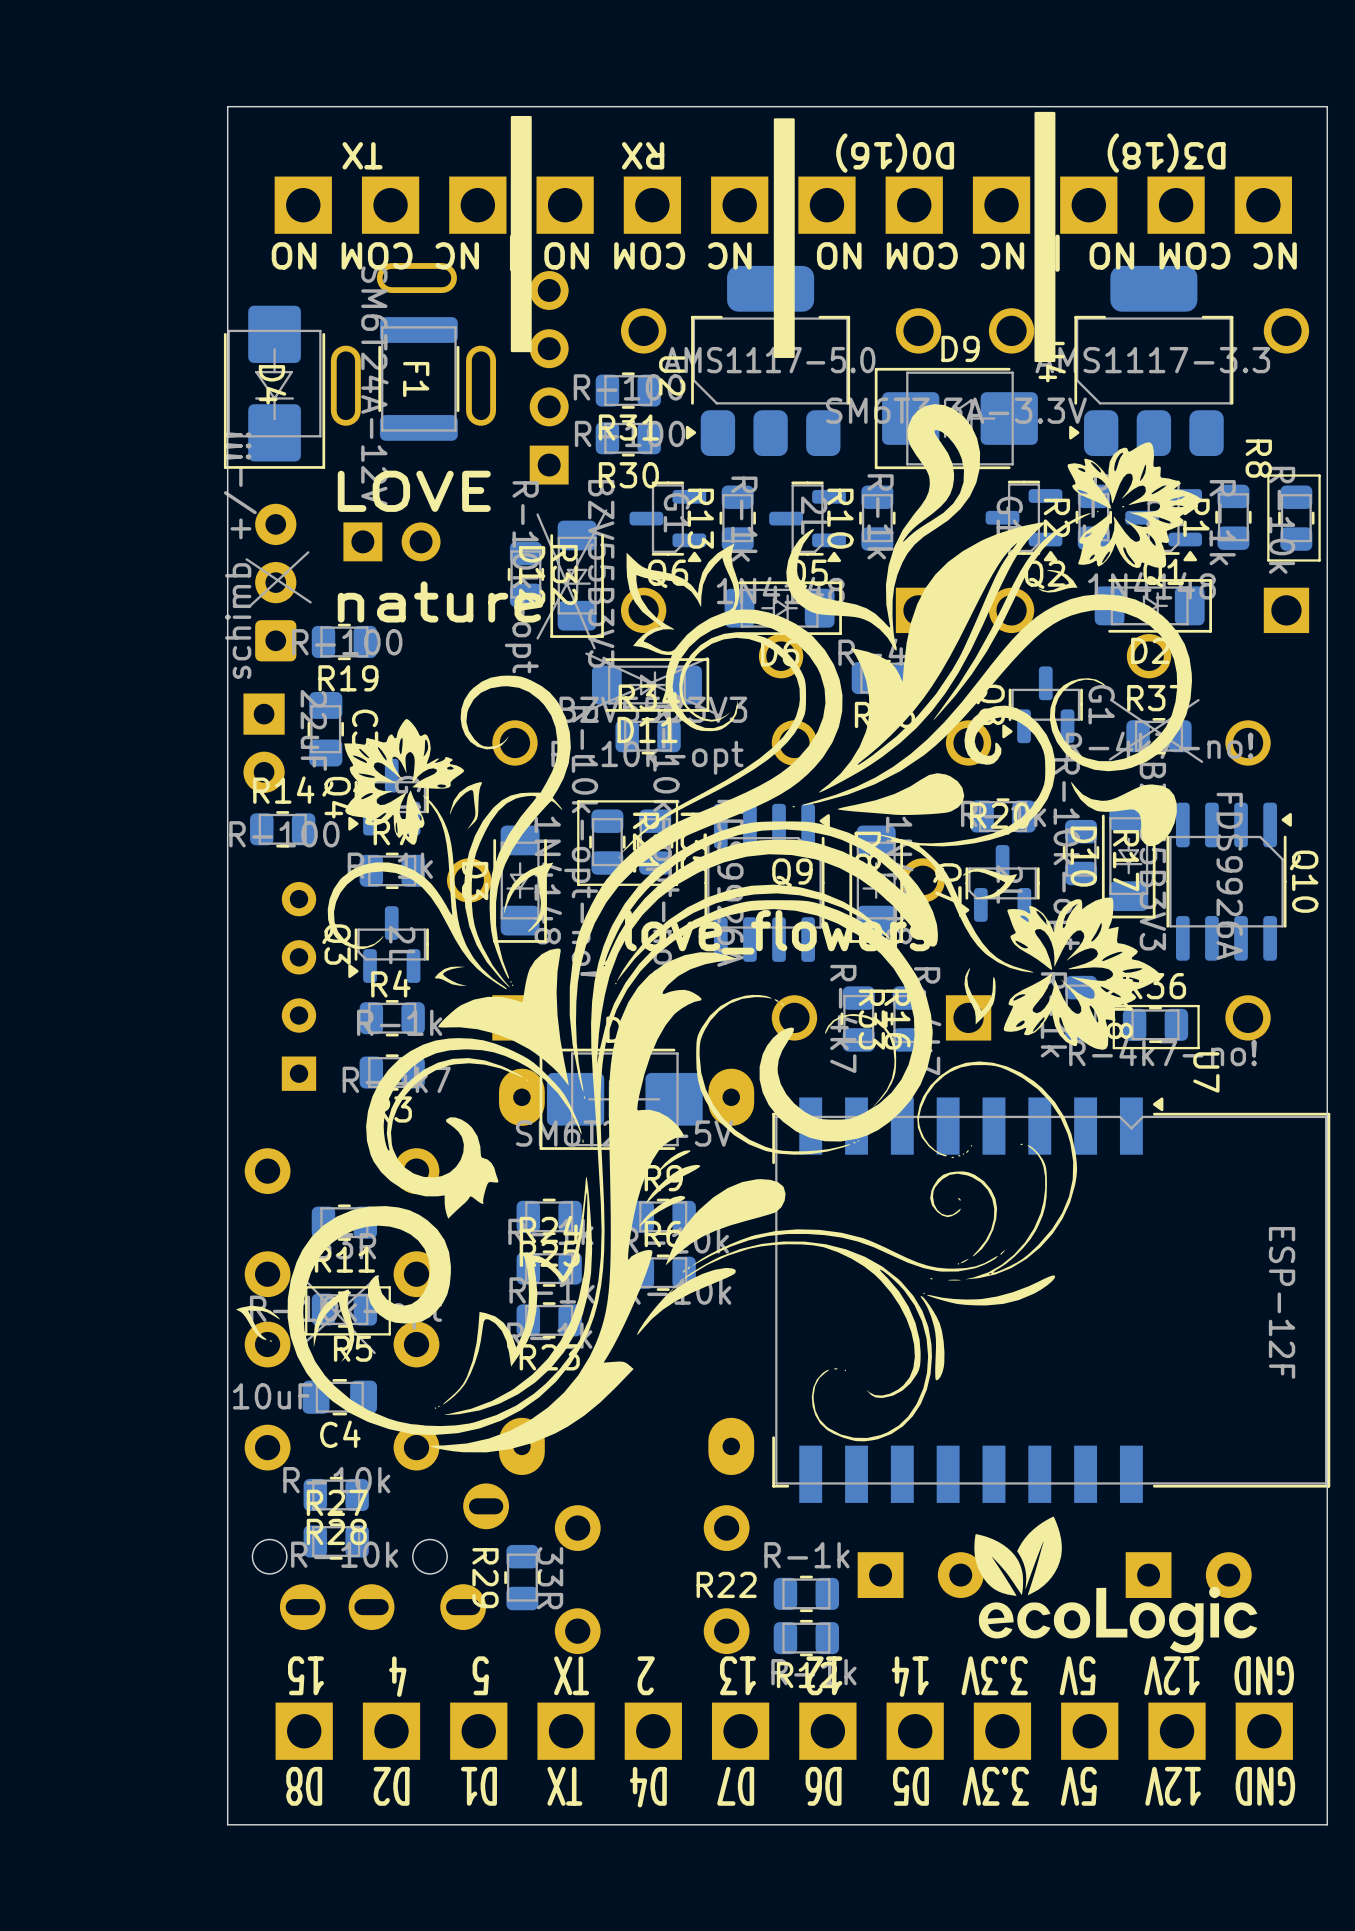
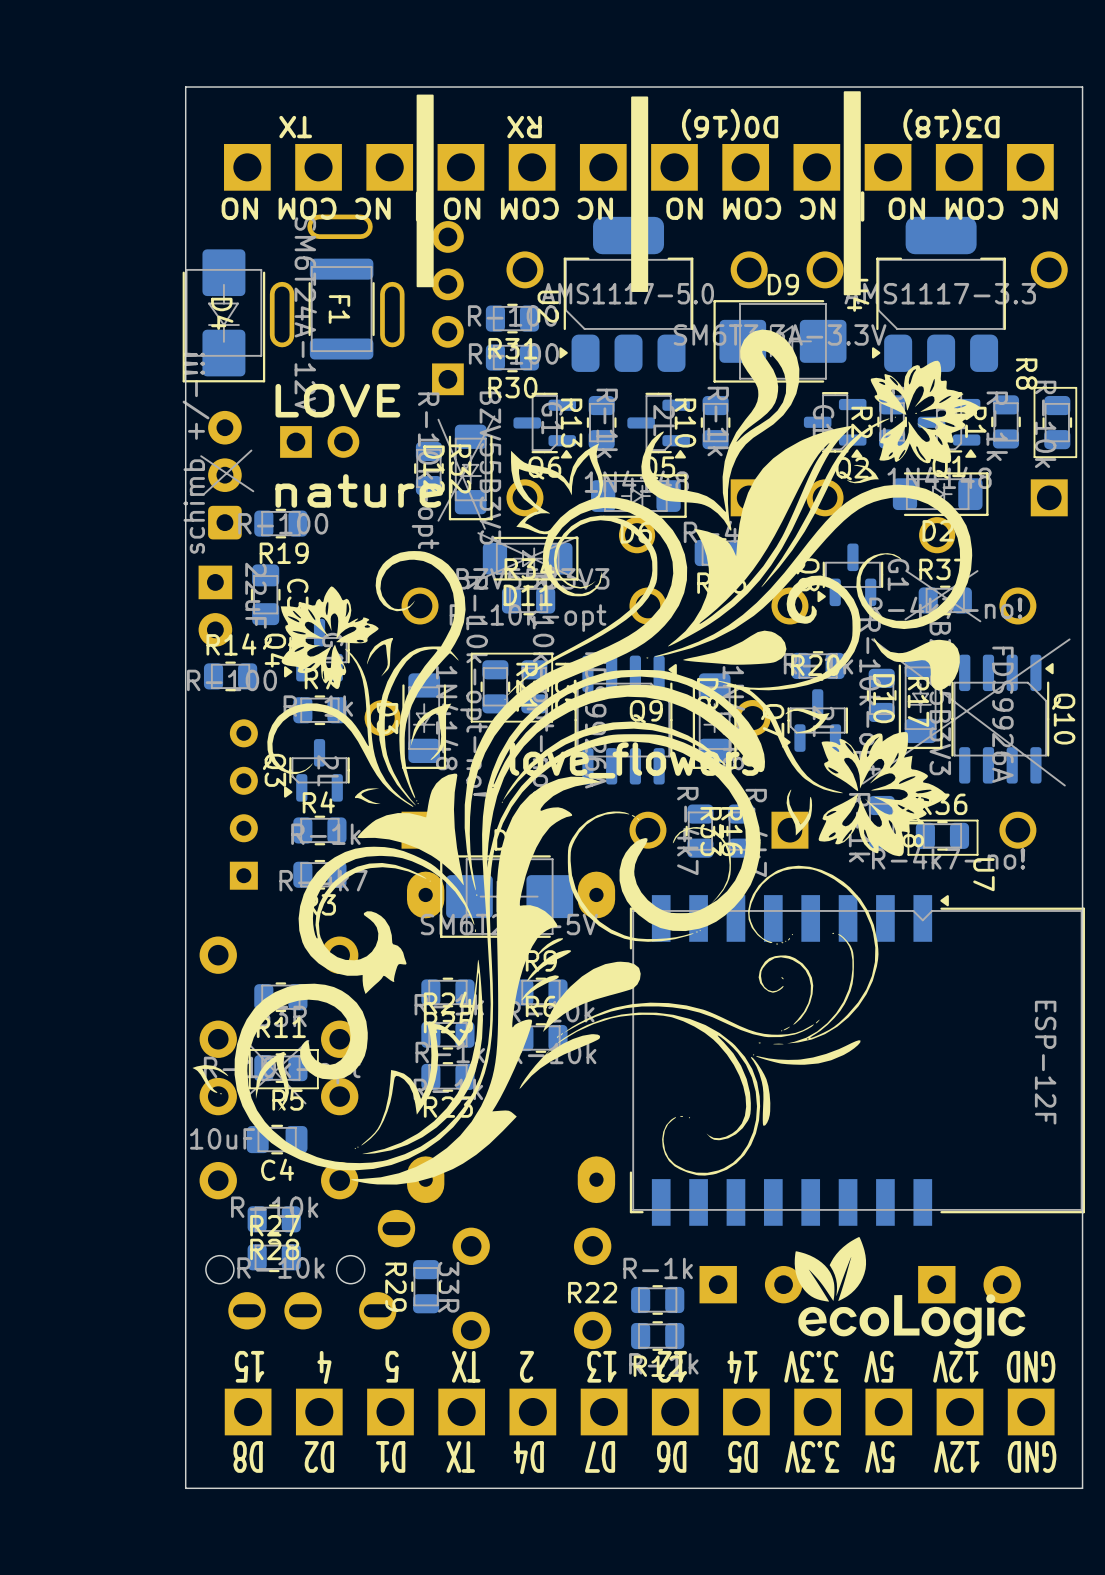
line: none -> (872, 639) (1064, 785)
line: none -> (1069, 639) (862, 783)

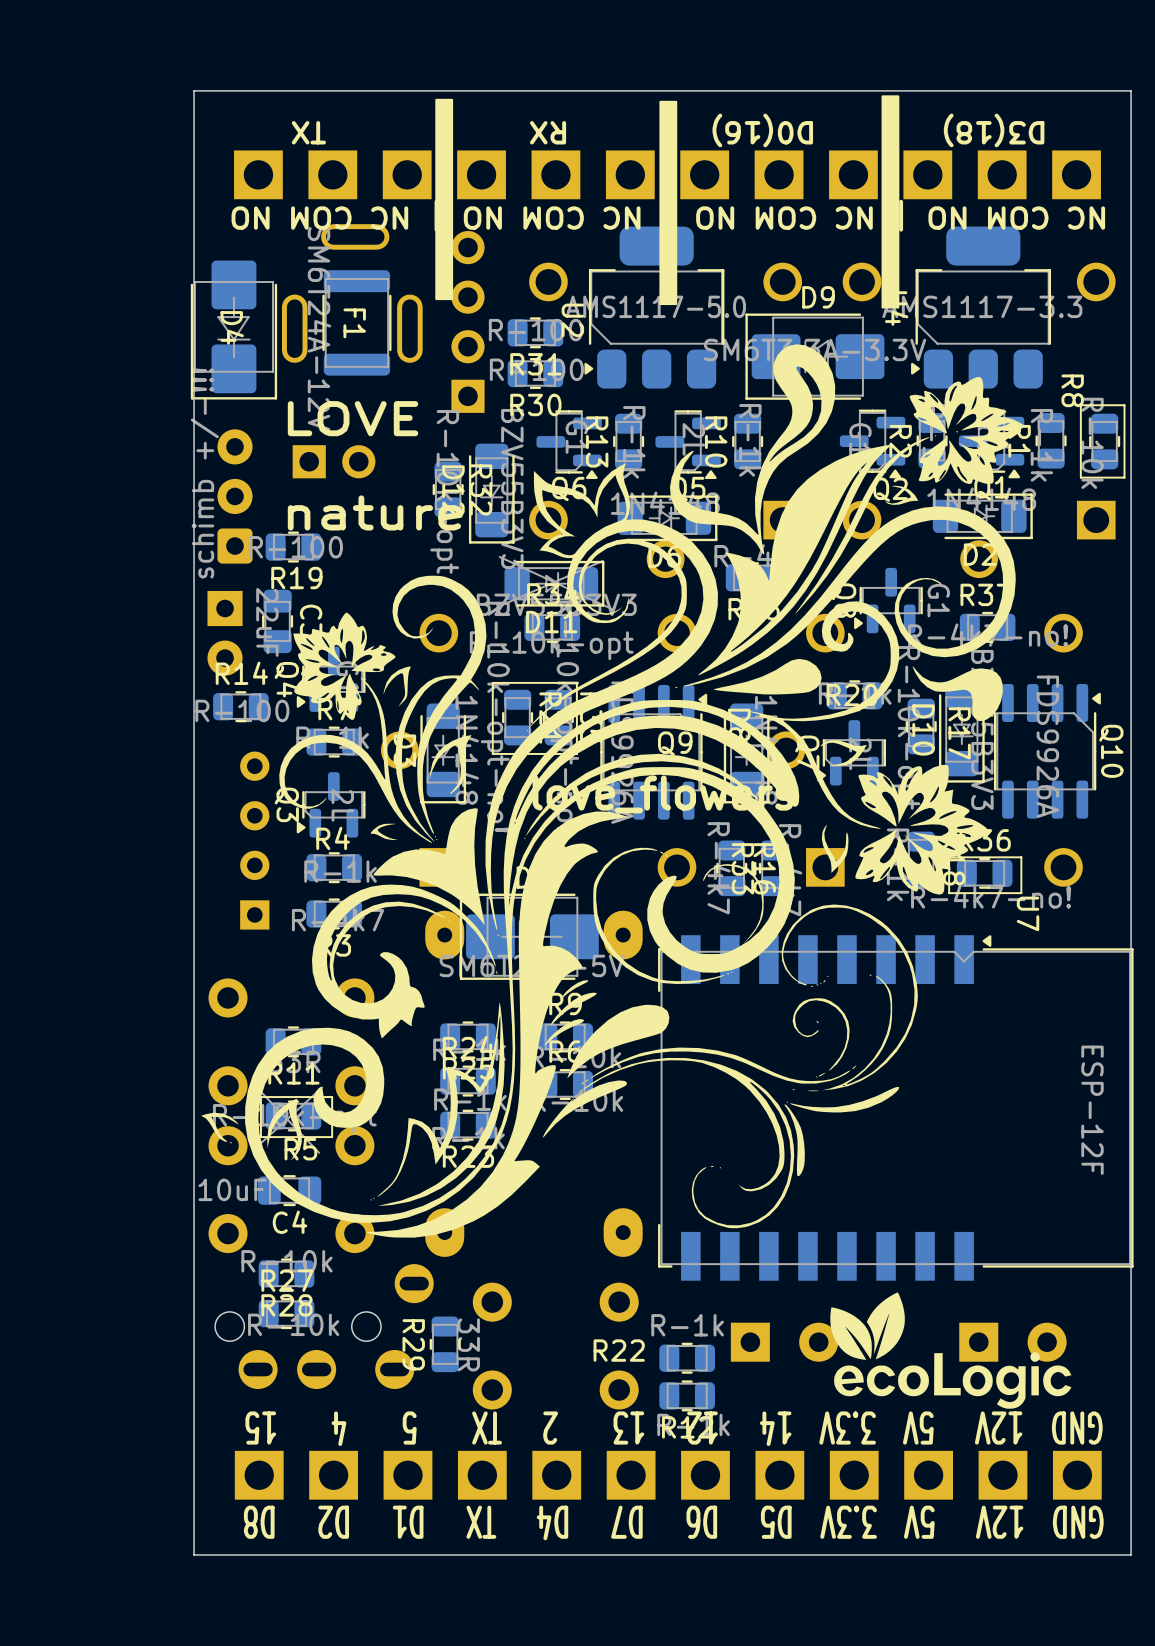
line: (494, 416) (438, 520) -> none
line: (438, 419) (484, 528) -> none
line: (251, 450) (203, 494) -> none
line: (201, 456) (253, 491) -> none
line: (906, 571) (980, 621) -> none
line: (977, 571) (905, 619) -> none
line: (872, 639) (1064, 785) -> none
line: (1069, 639) (862, 783) -> none

